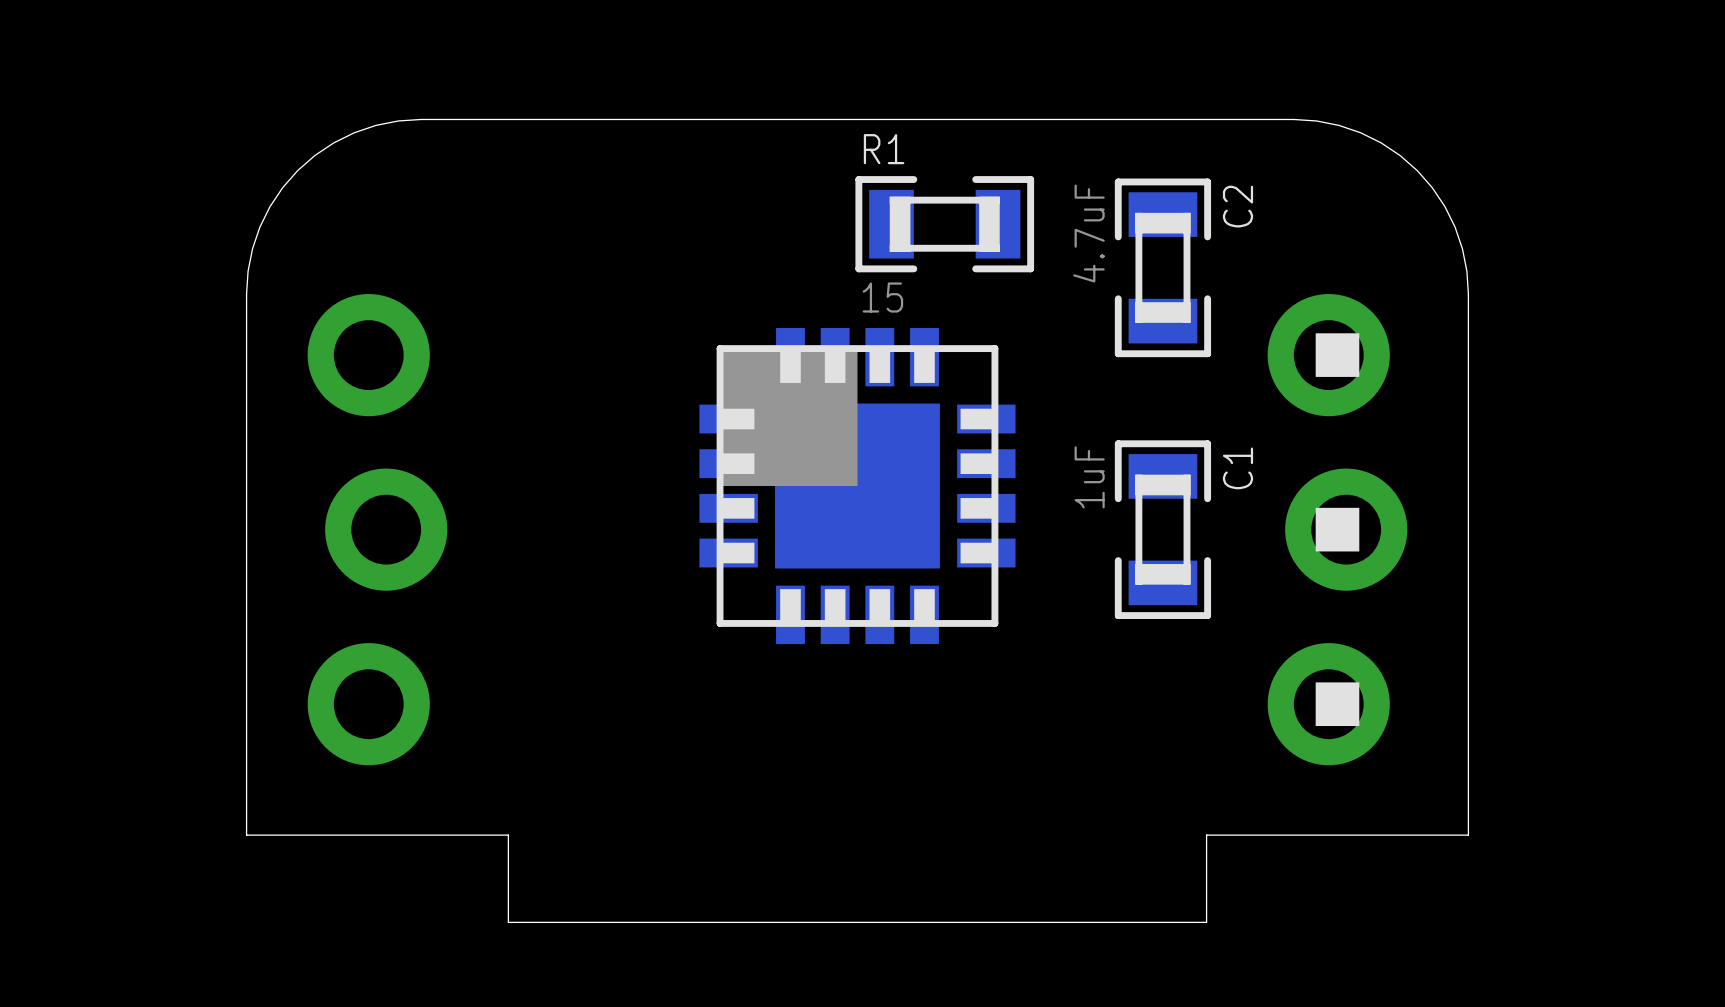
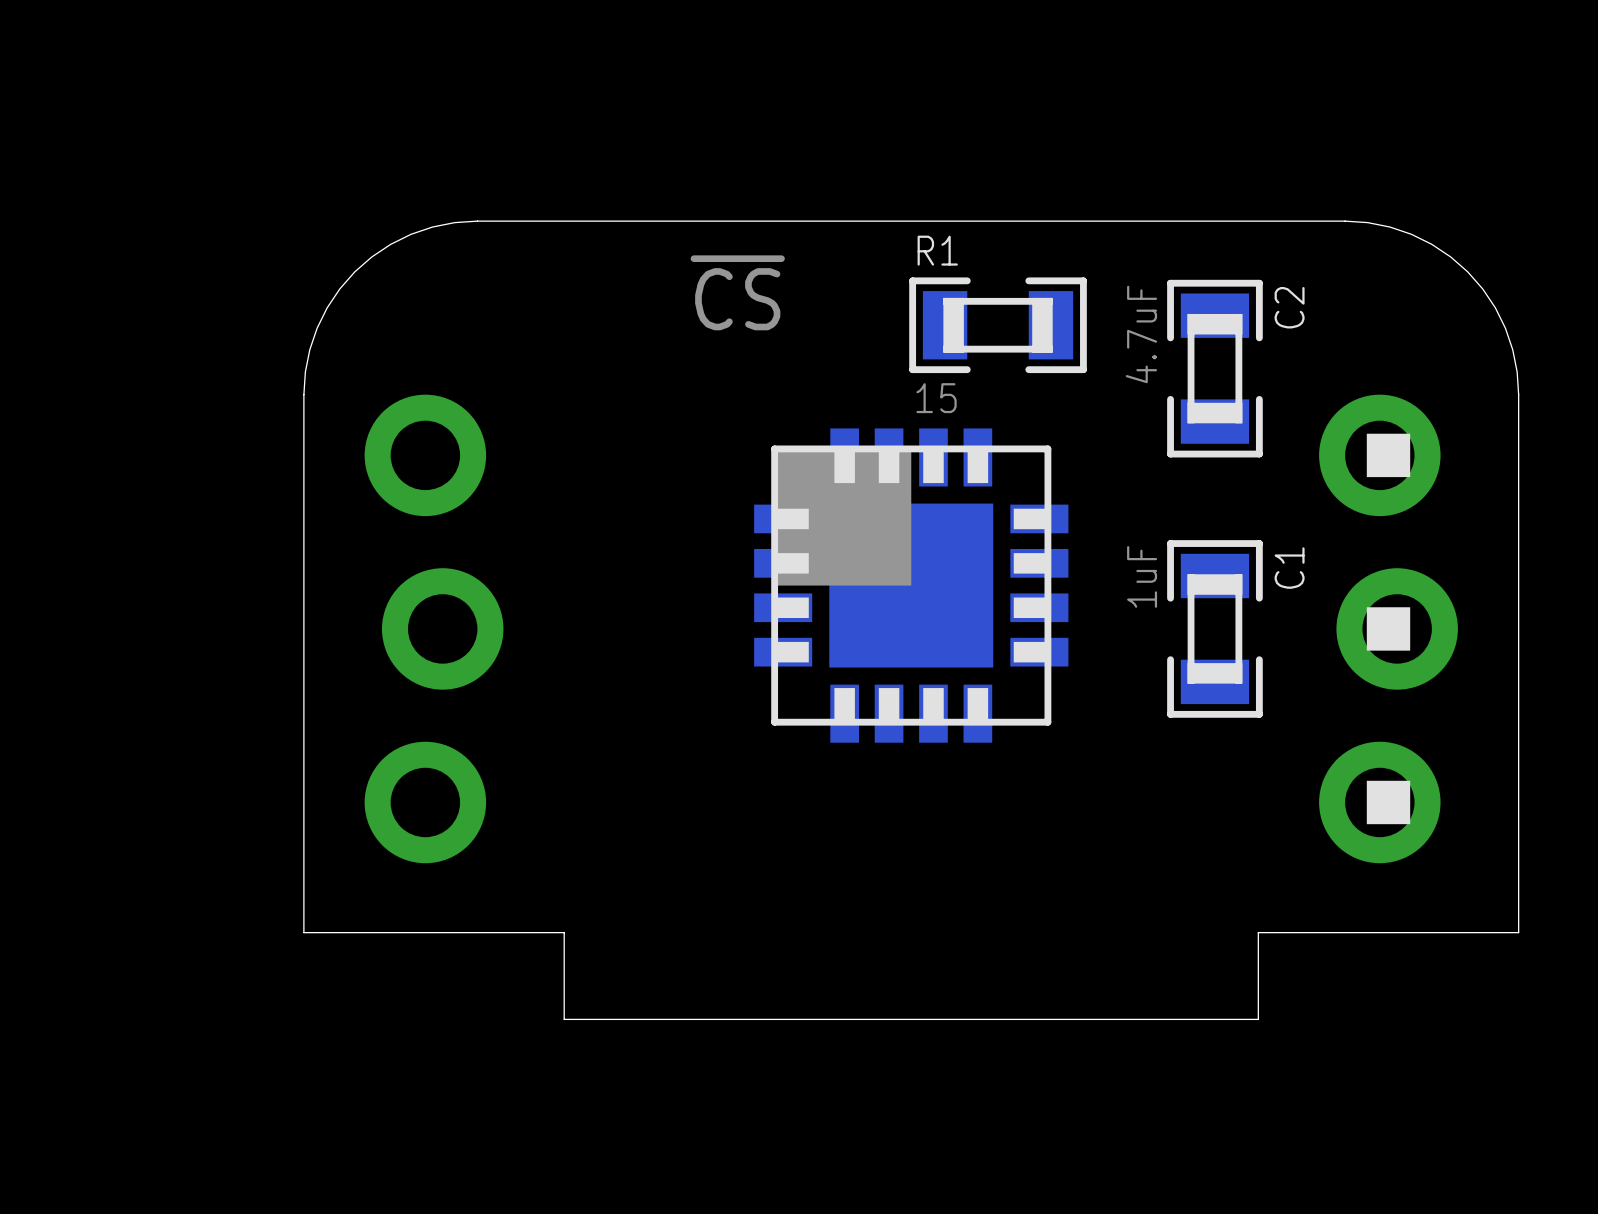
text: none -> ~{CS} (737, 292)

